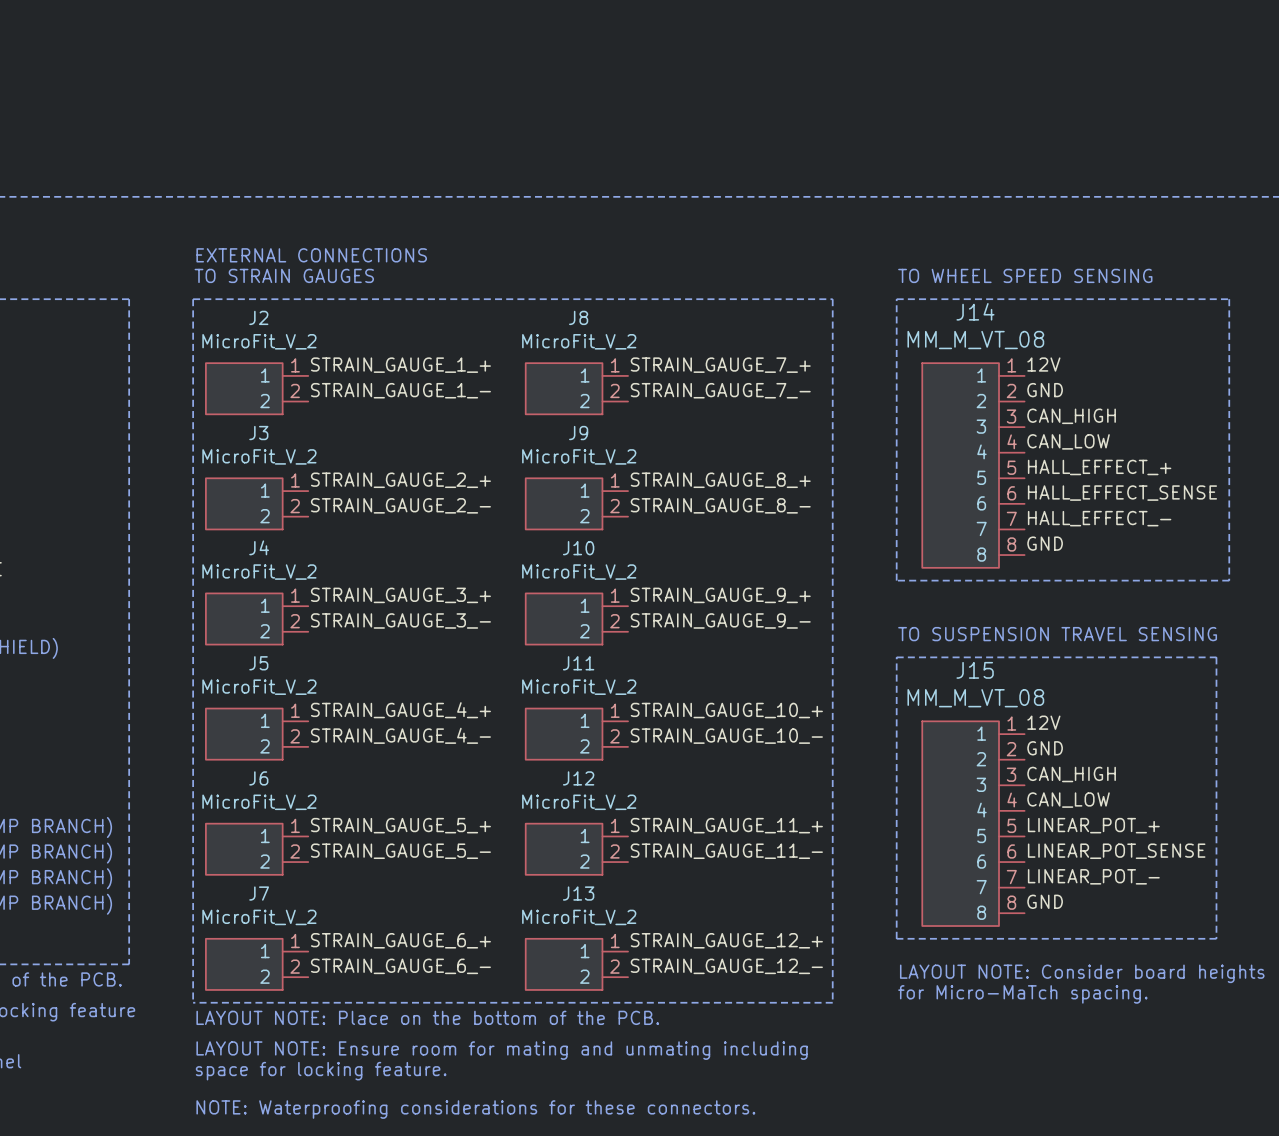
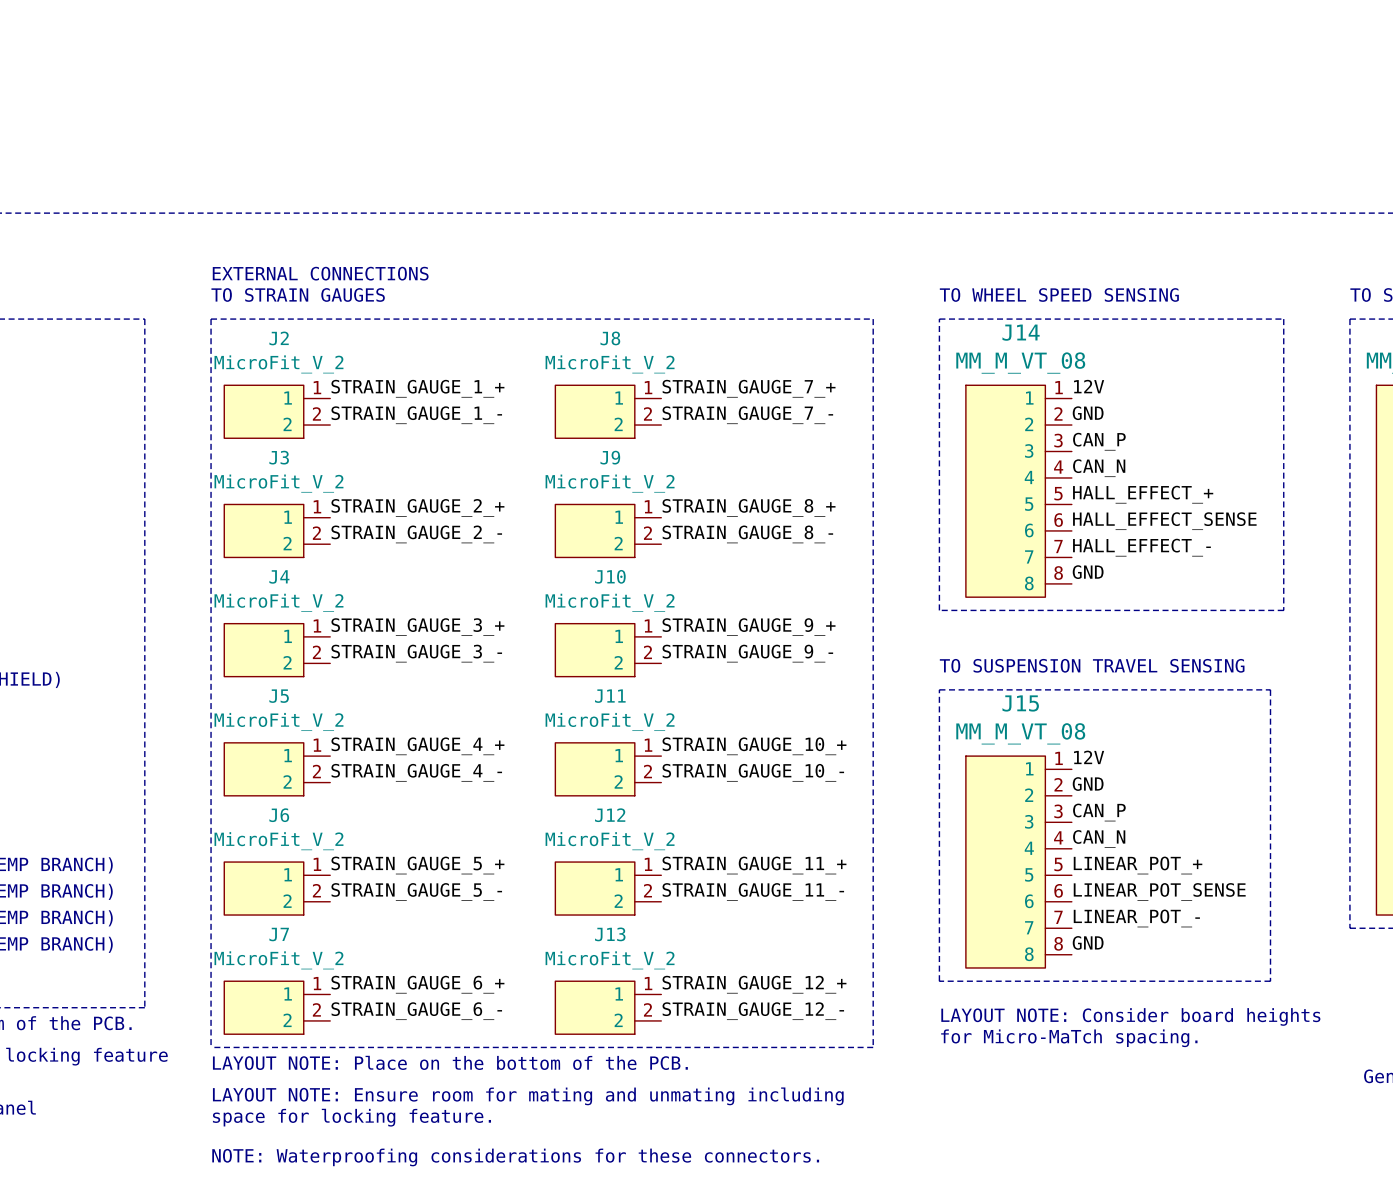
label: CAN_HIGH (1071, 416) -> CAN_P (1099, 441)
label: CAN_LOW (1068, 441) -> CAN_N (1099, 468)
label: CAN_HIGH (1071, 774) -> CAN_P (1099, 812)
label: CAN_LOW (1068, 800) -> CAN_N (1099, 839)

